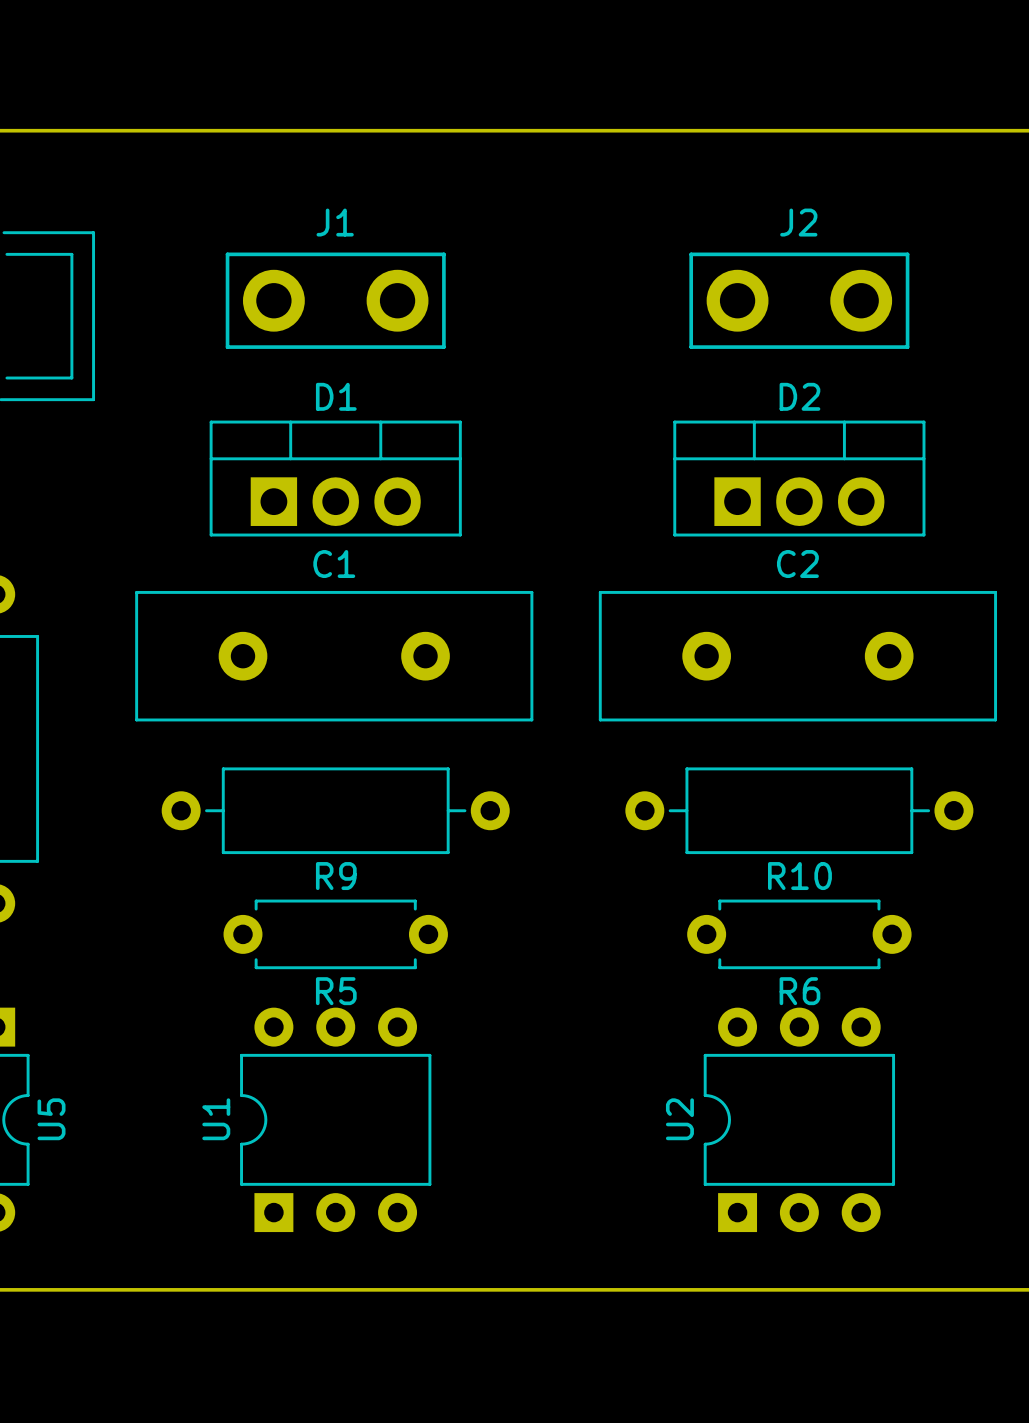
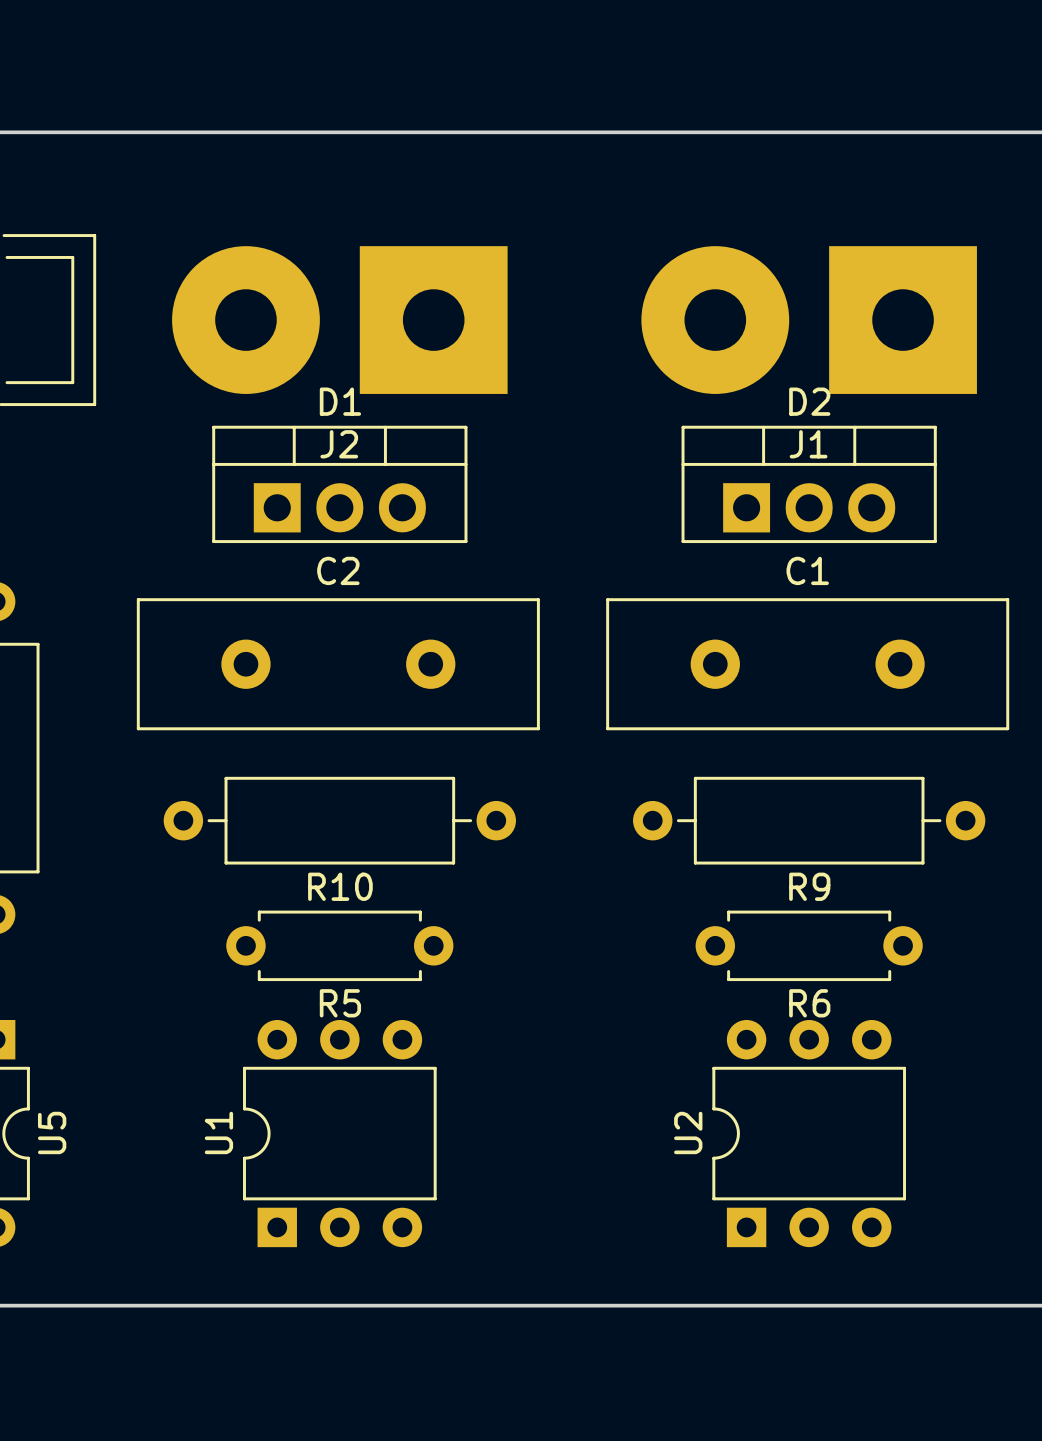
J1 name position: J1 (335, 222) -> J1 (808, 444)
J2 name position: J2 (798, 222) -> J2 (339, 444)
J1 footprint: [225, 252, 446, 349] -> [641, 246, 977, 394]
J2 footprint: [689, 252, 910, 349] -> [172, 246, 508, 394]
C1 name: C1 (334, 564) -> C2 (338, 570)
C2 name: C2 (797, 564) -> C1 (807, 570)
R9 name: R9 (336, 876) -> R10 (340, 886)
R10 name: R10 (799, 876) -> R9 (809, 886)

